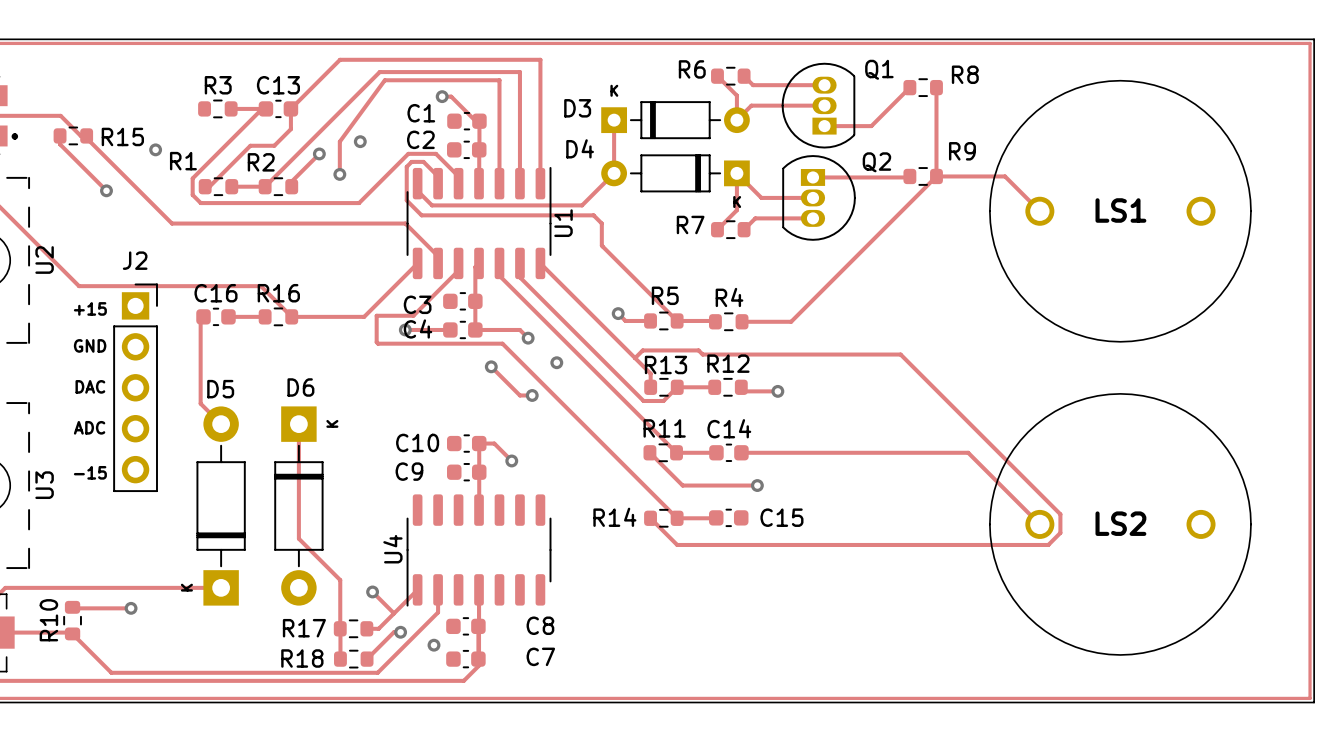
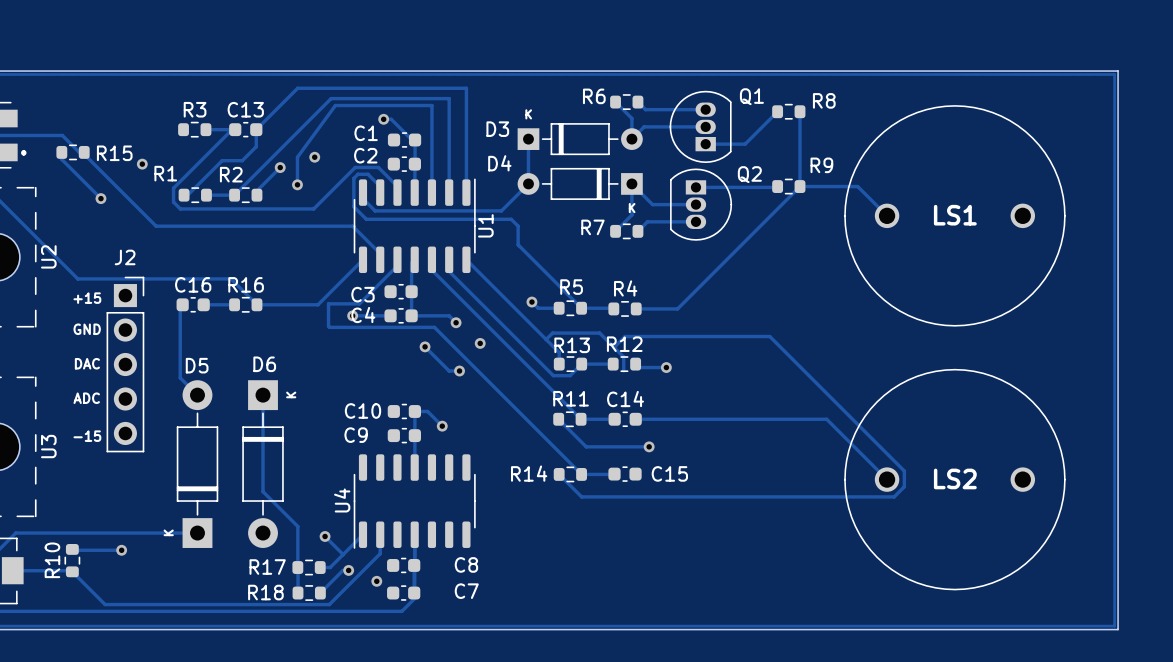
track: (702, 354) (728, 354) -> (614, 347) (625, 336)
track: none -> (603, 336) (623, 357) (623, 371)

